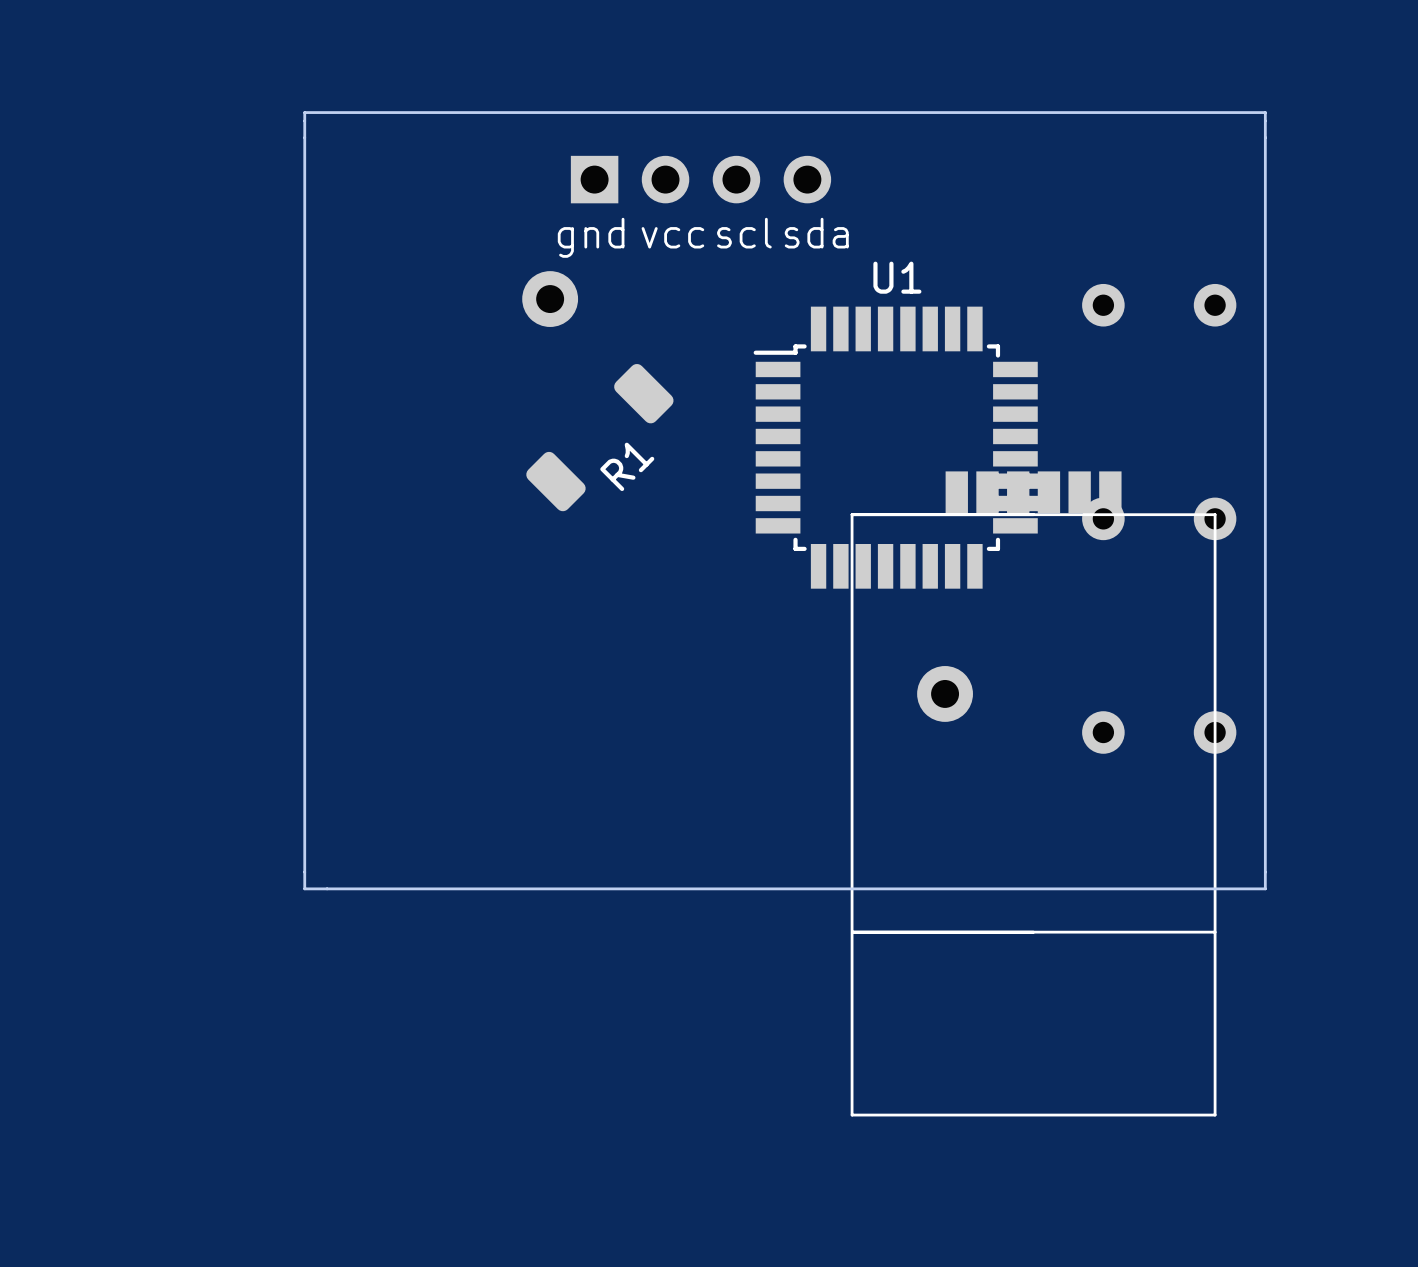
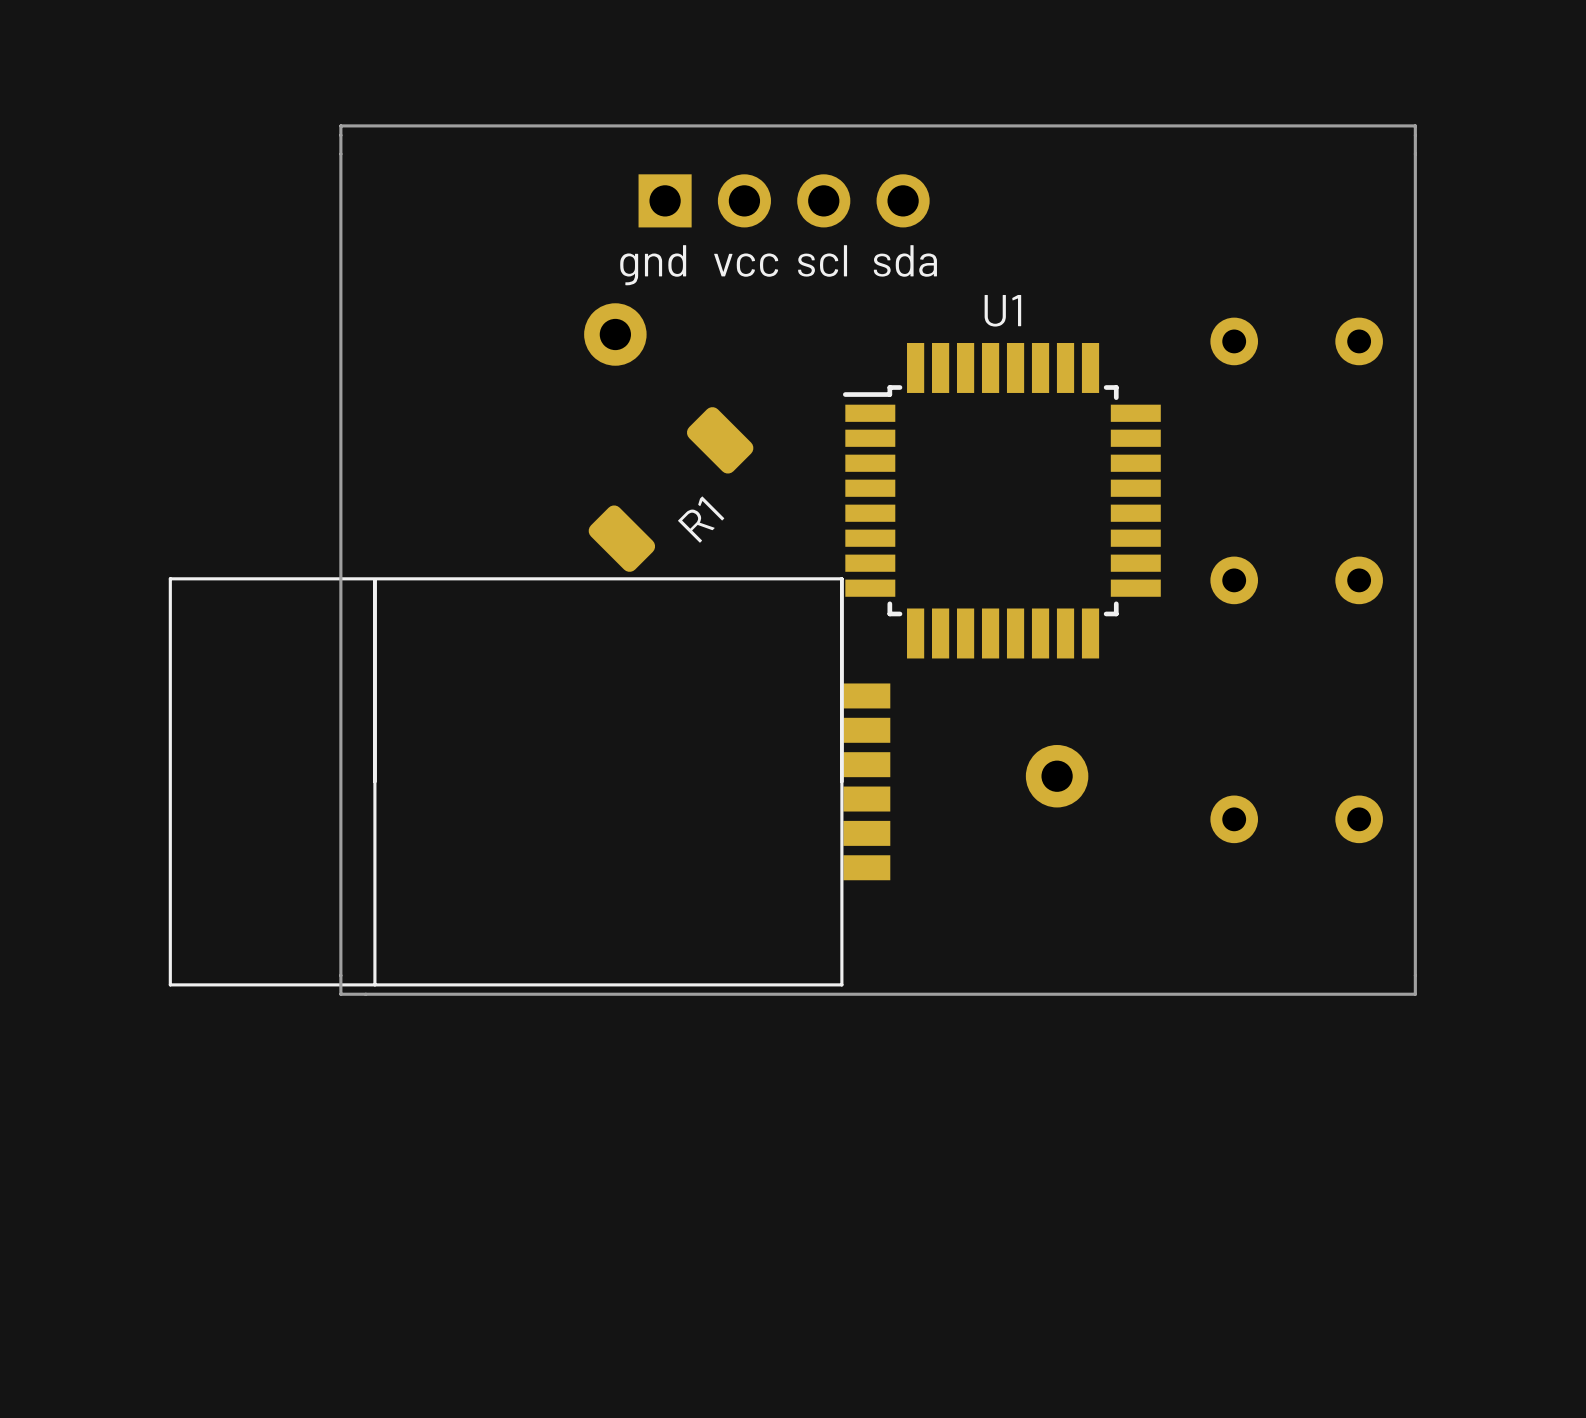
part rotation: 0° (1033, 793) -> 90° clockwise (529, 781)
part position: (1033, 793) -> (529, 781)

